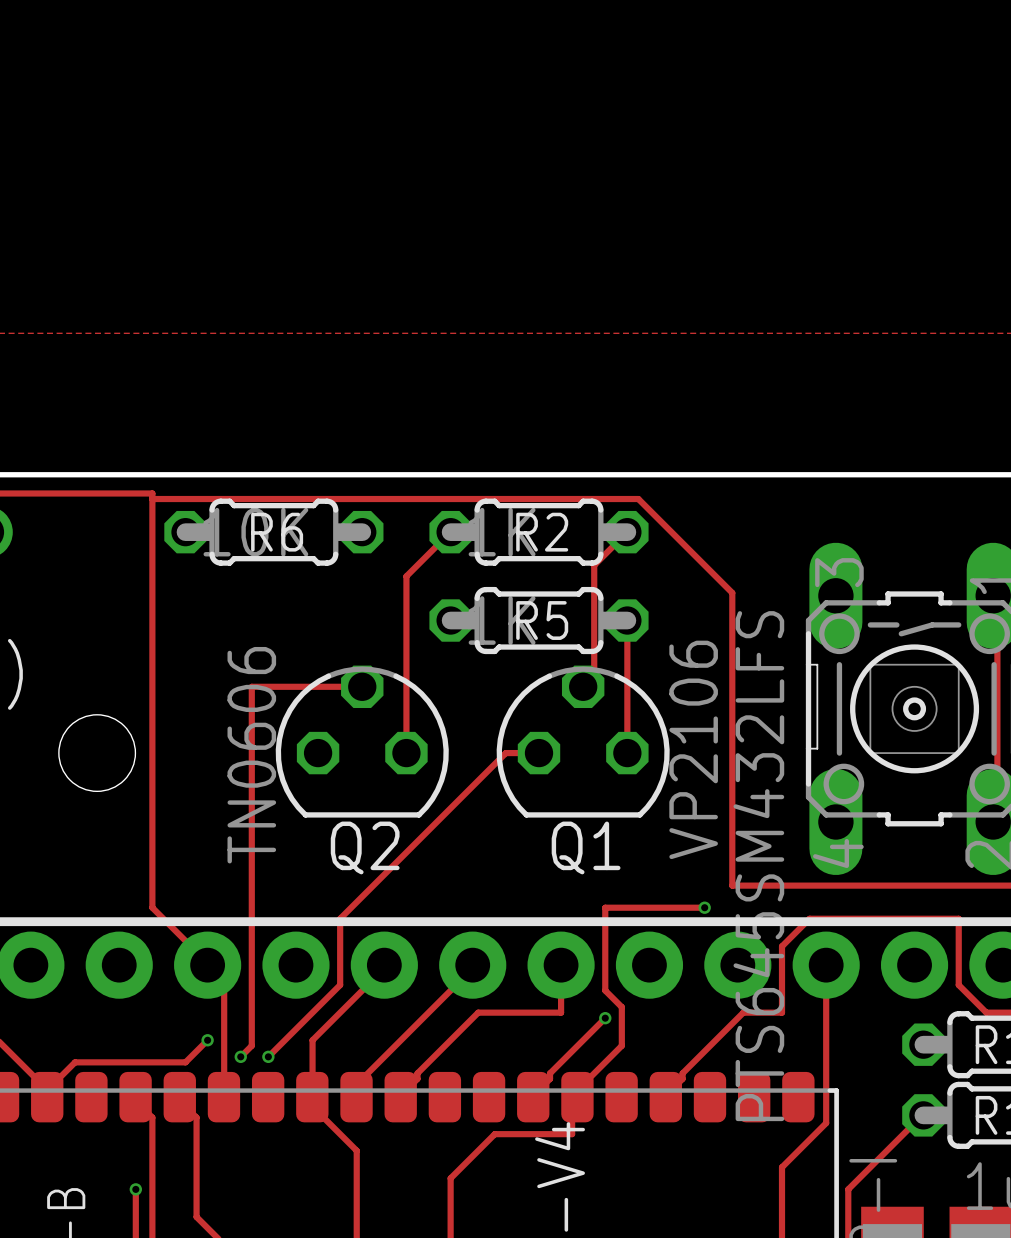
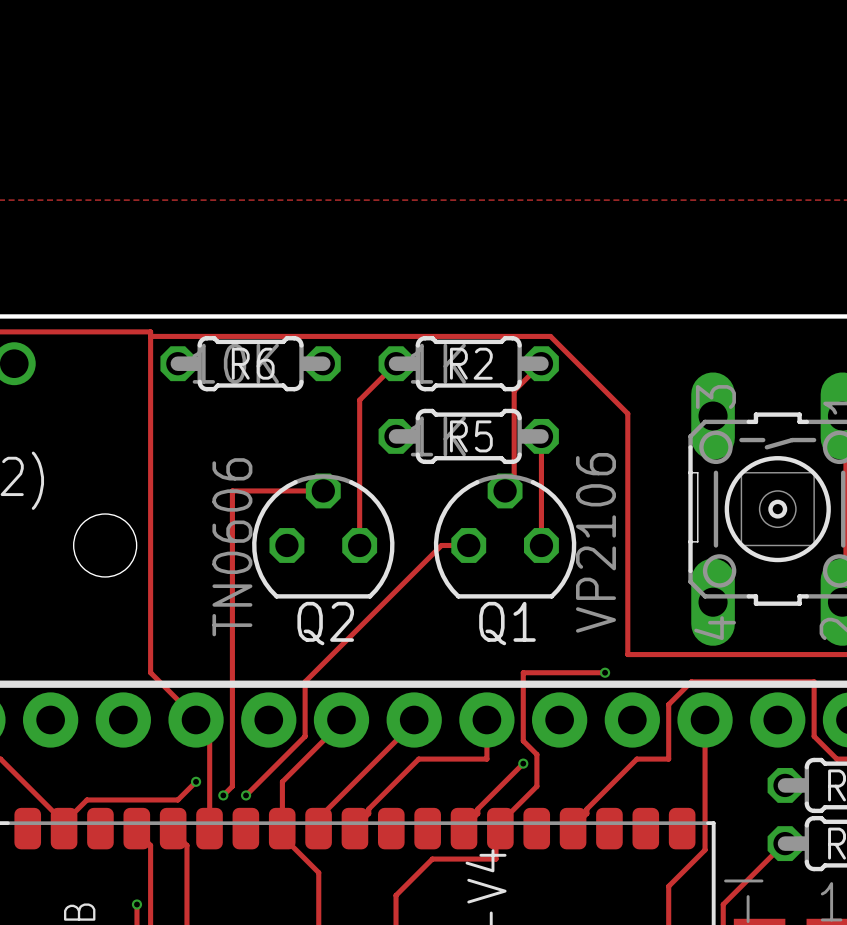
part value: PTS645SM432LFS (758, 866) -> none

